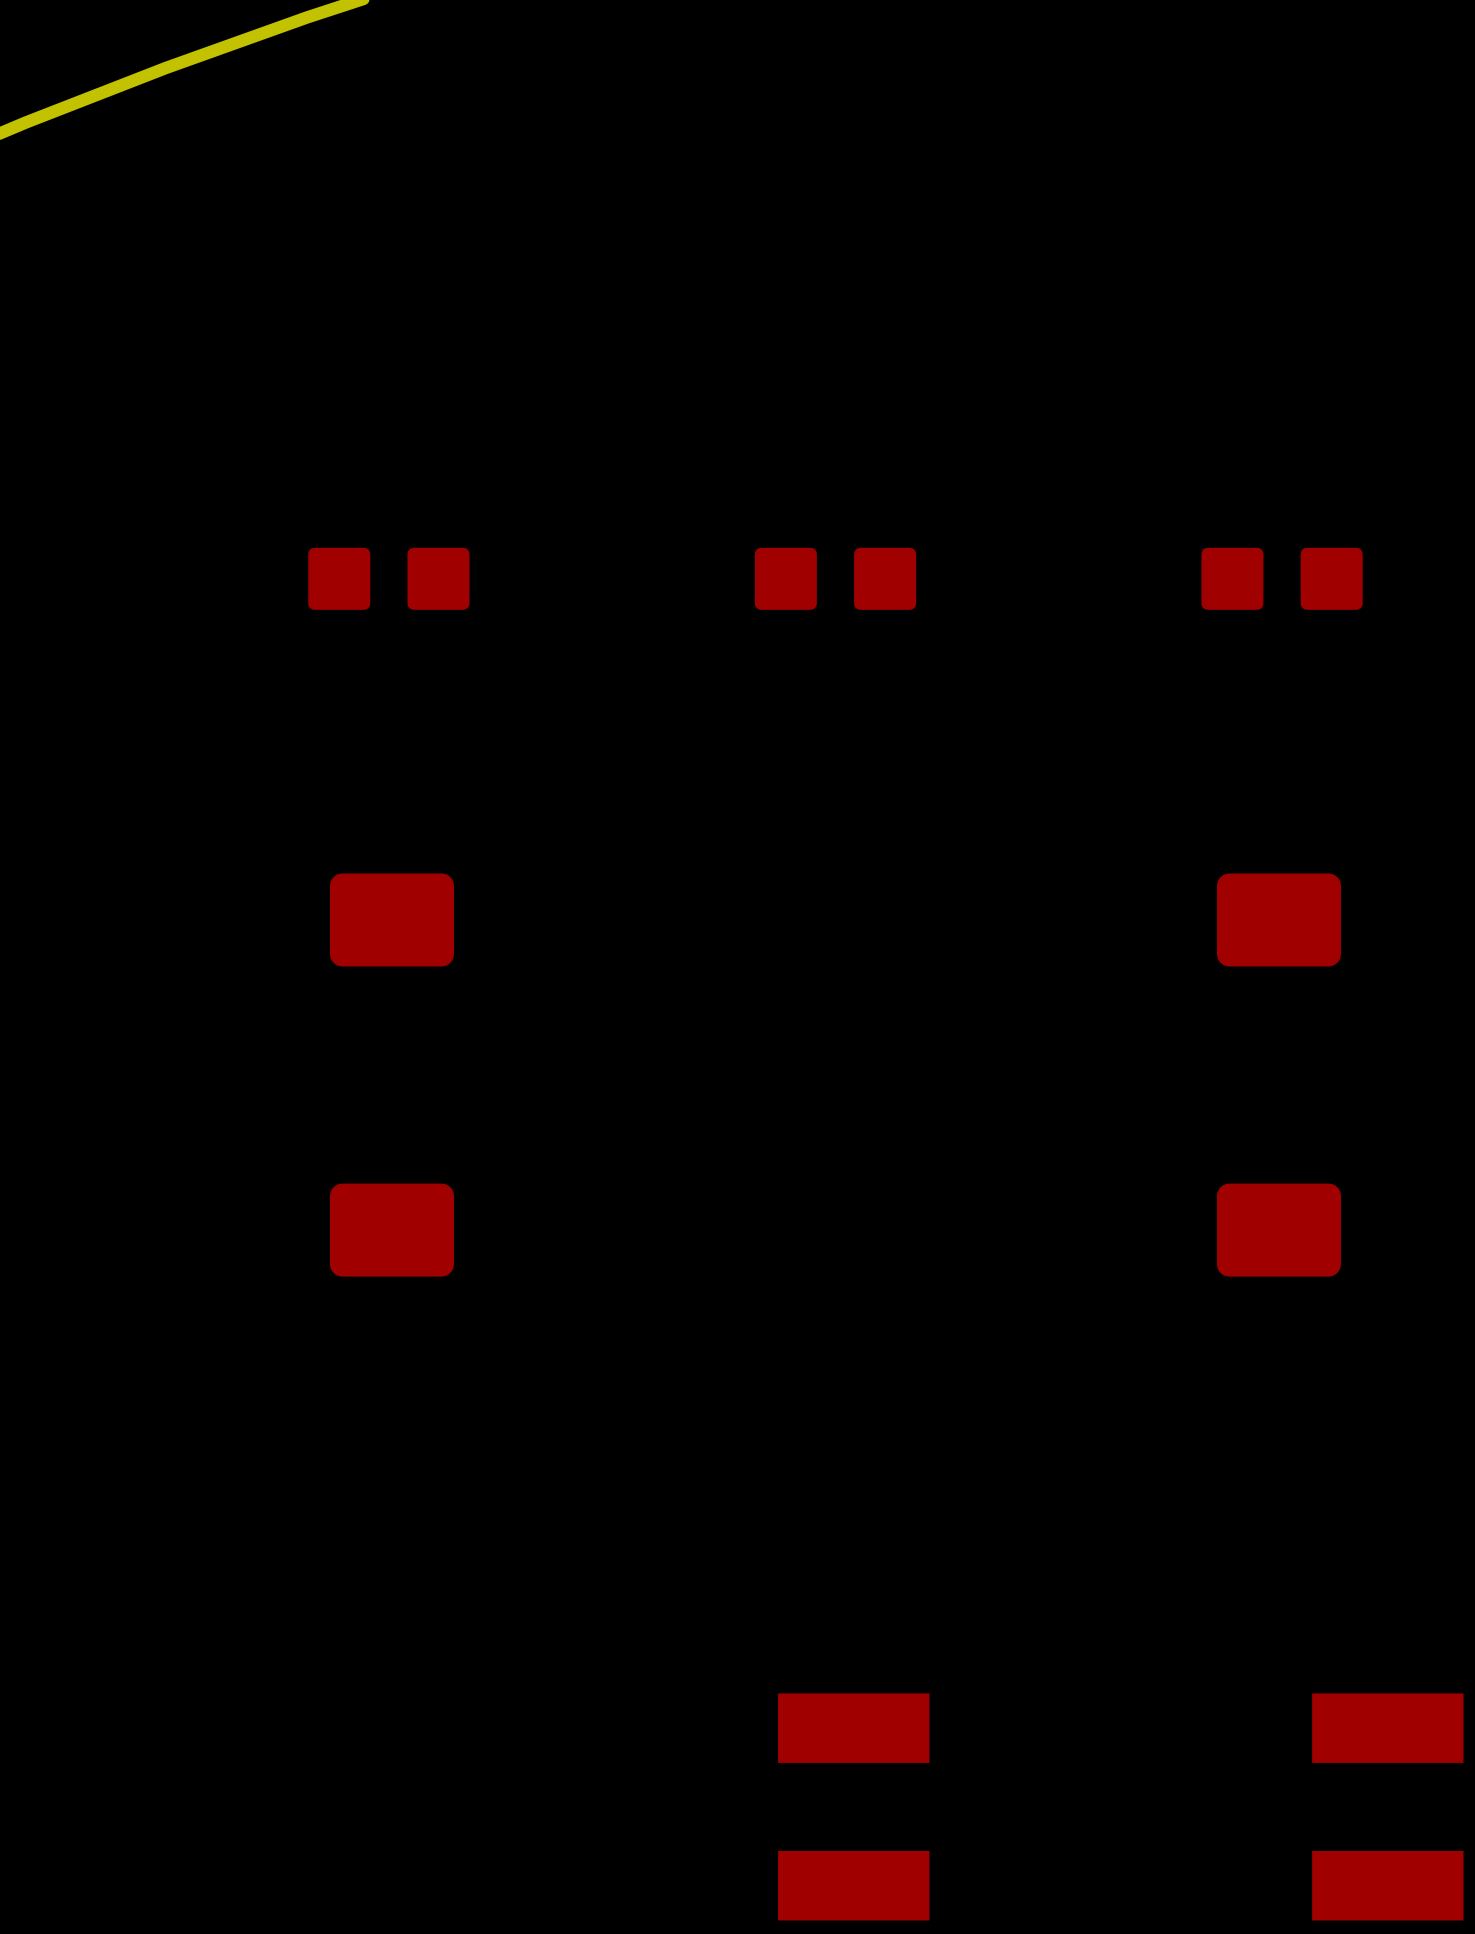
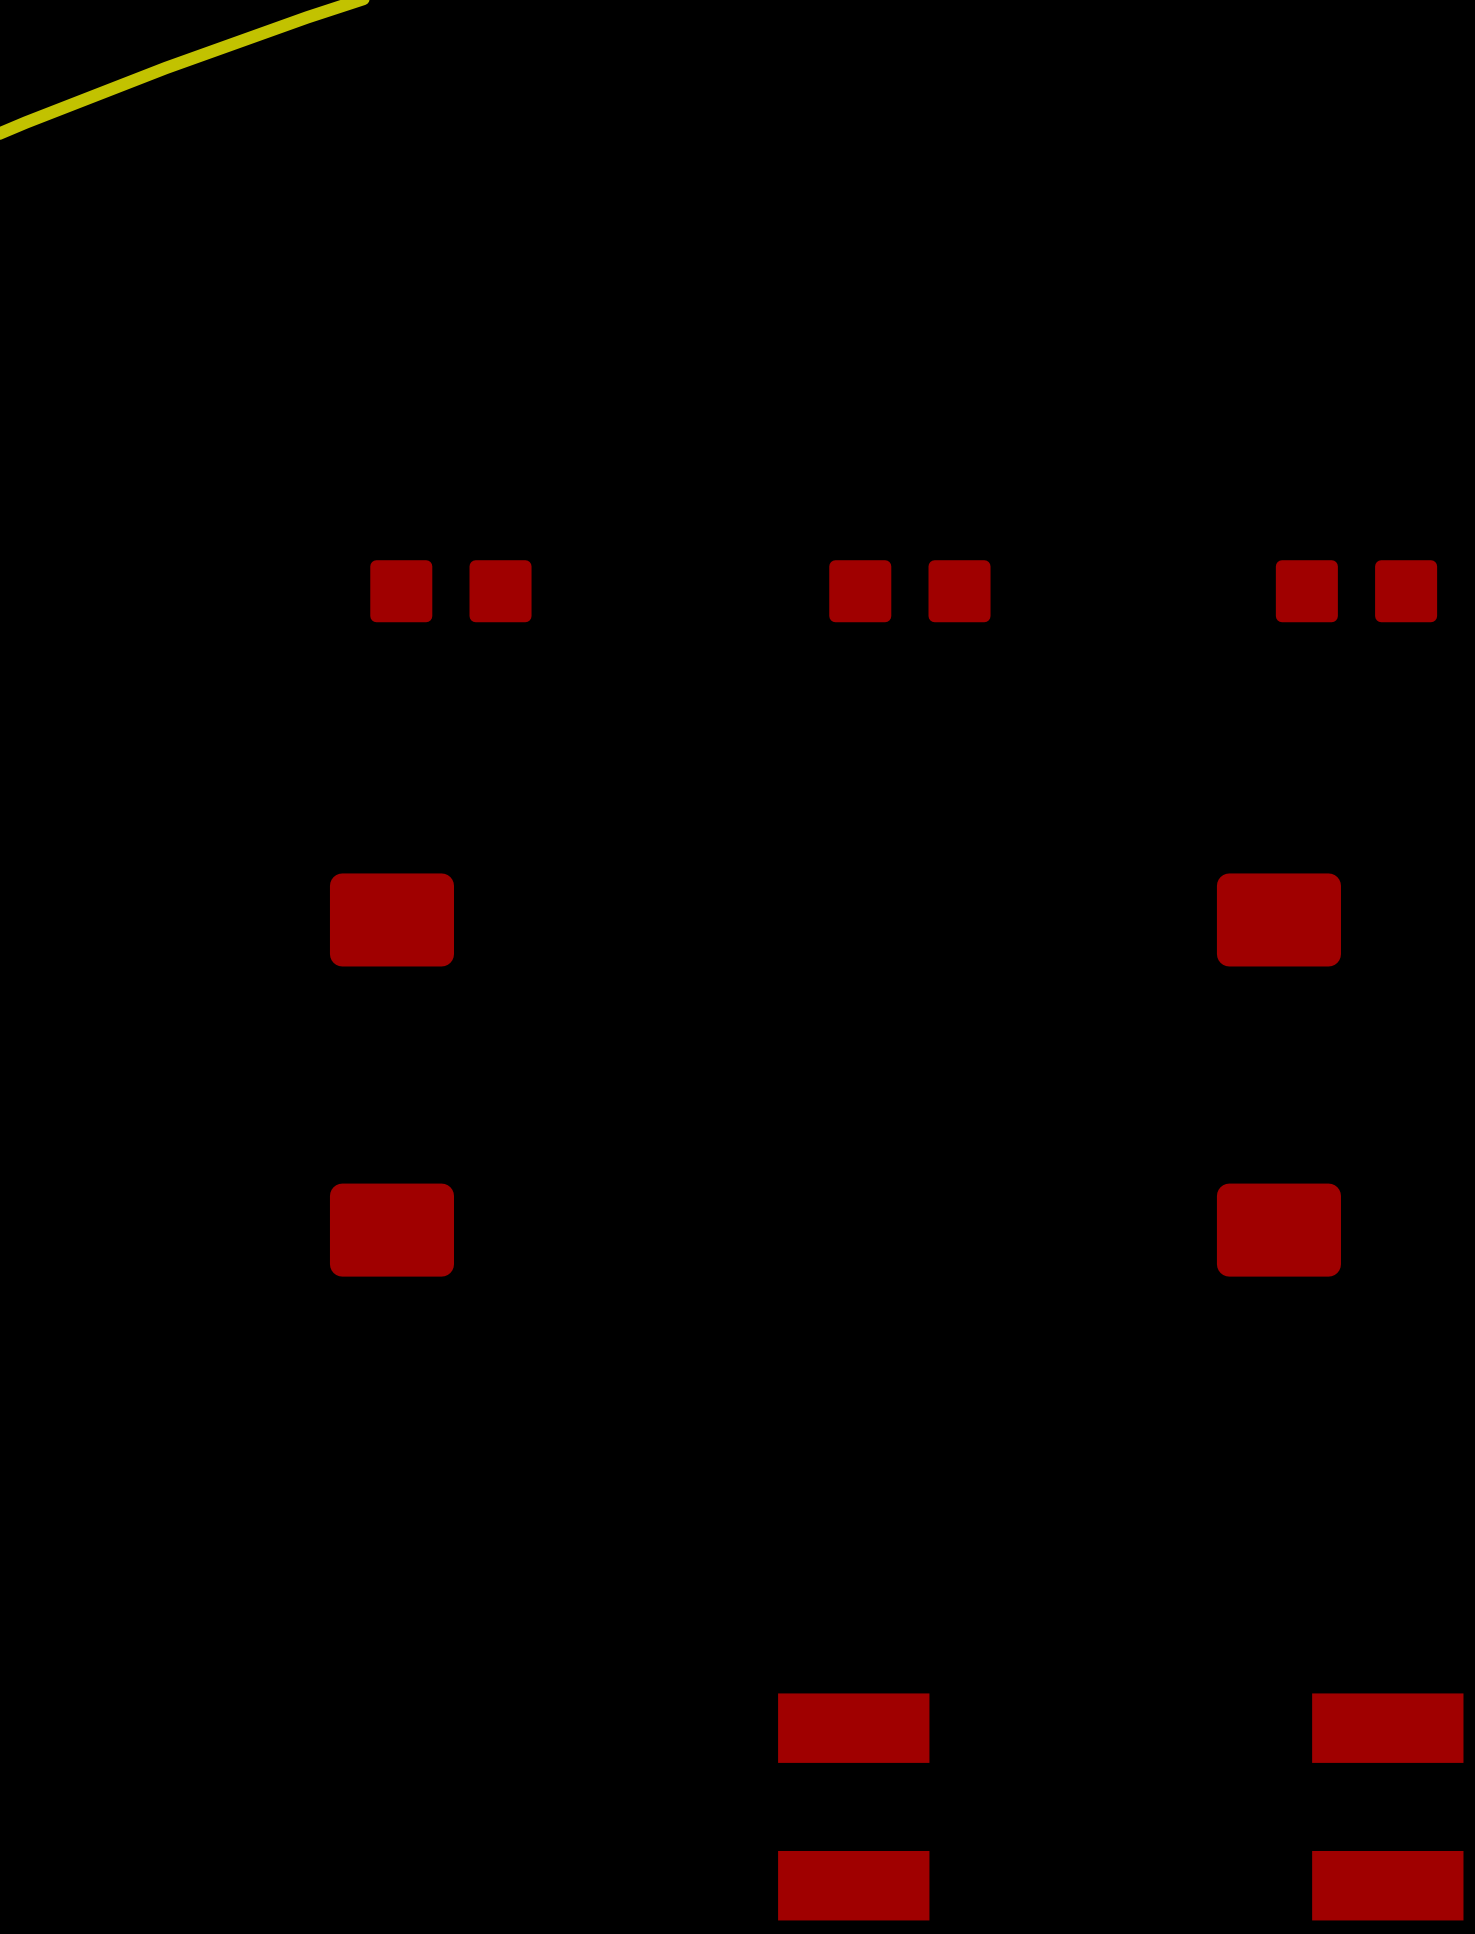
part position: (388, 578) -> (450, 591)
part position: (835, 578) -> (909, 591)
part position: (1282, 578) -> (1356, 591)

